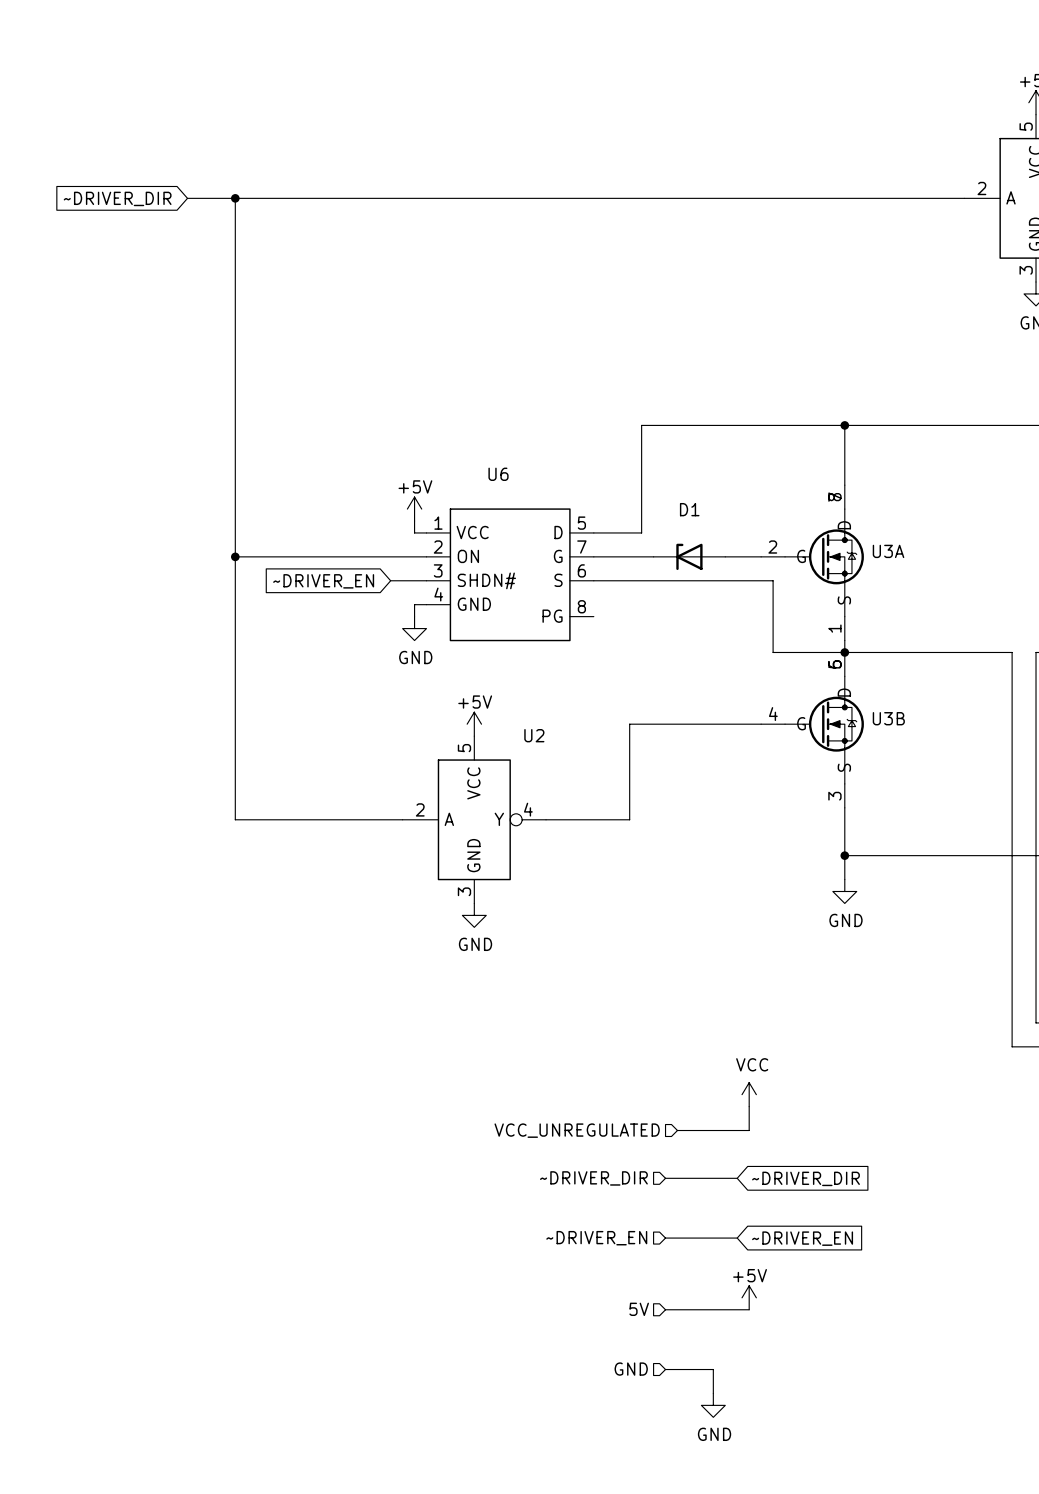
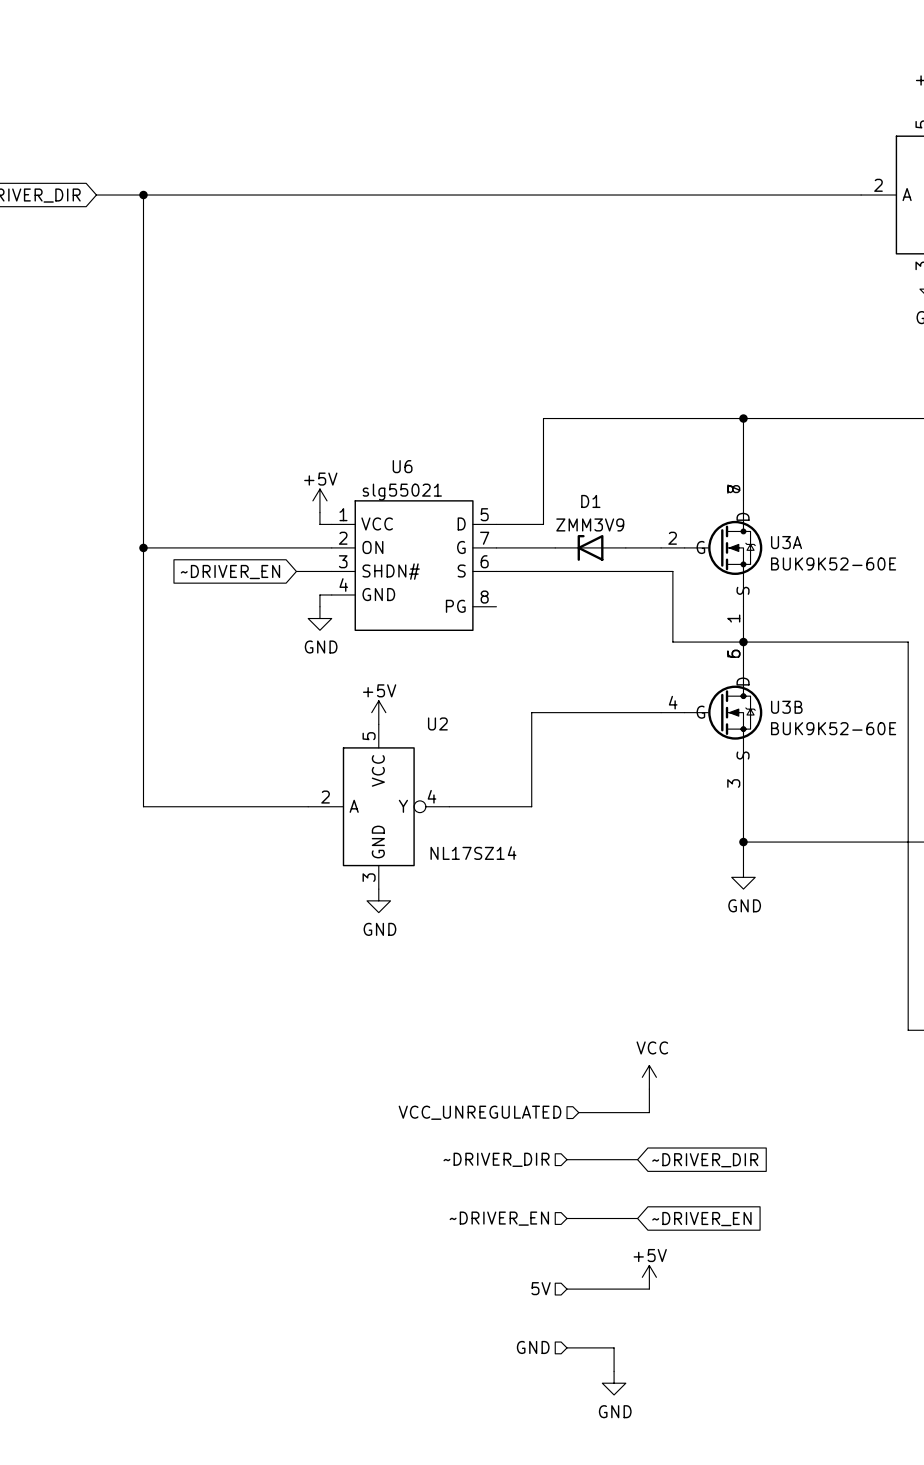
U6 value: none -> slg55021 (402, 492)
D1 value: none -> ZMM3V9 (590, 524)
U3A value: none -> BUK9K52-60E (833, 563)
U3B value: none -> BUK9K52-60E (833, 728)
U2 value: none -> NL17SZ14 (473, 853)

